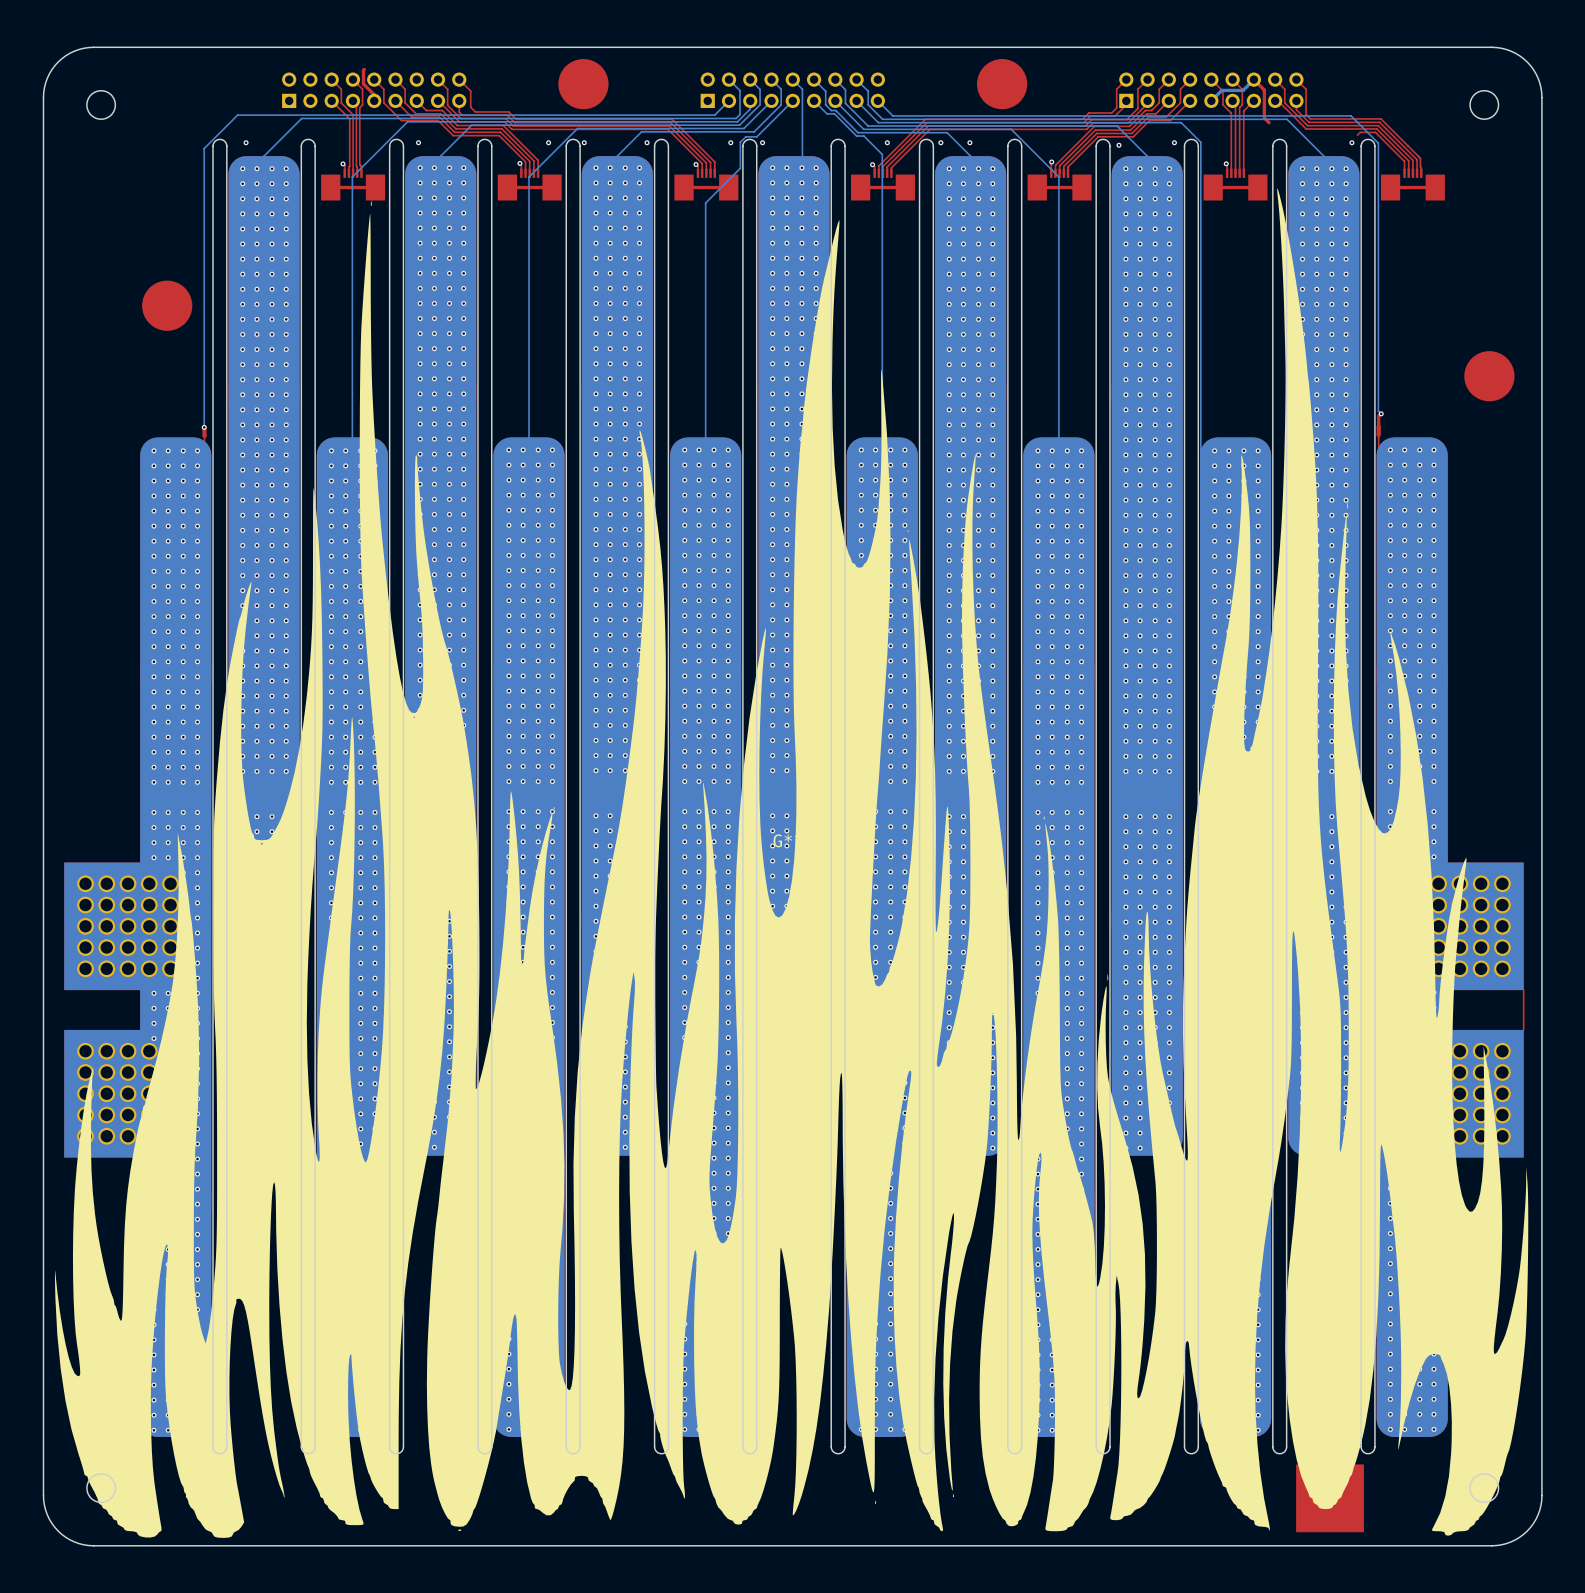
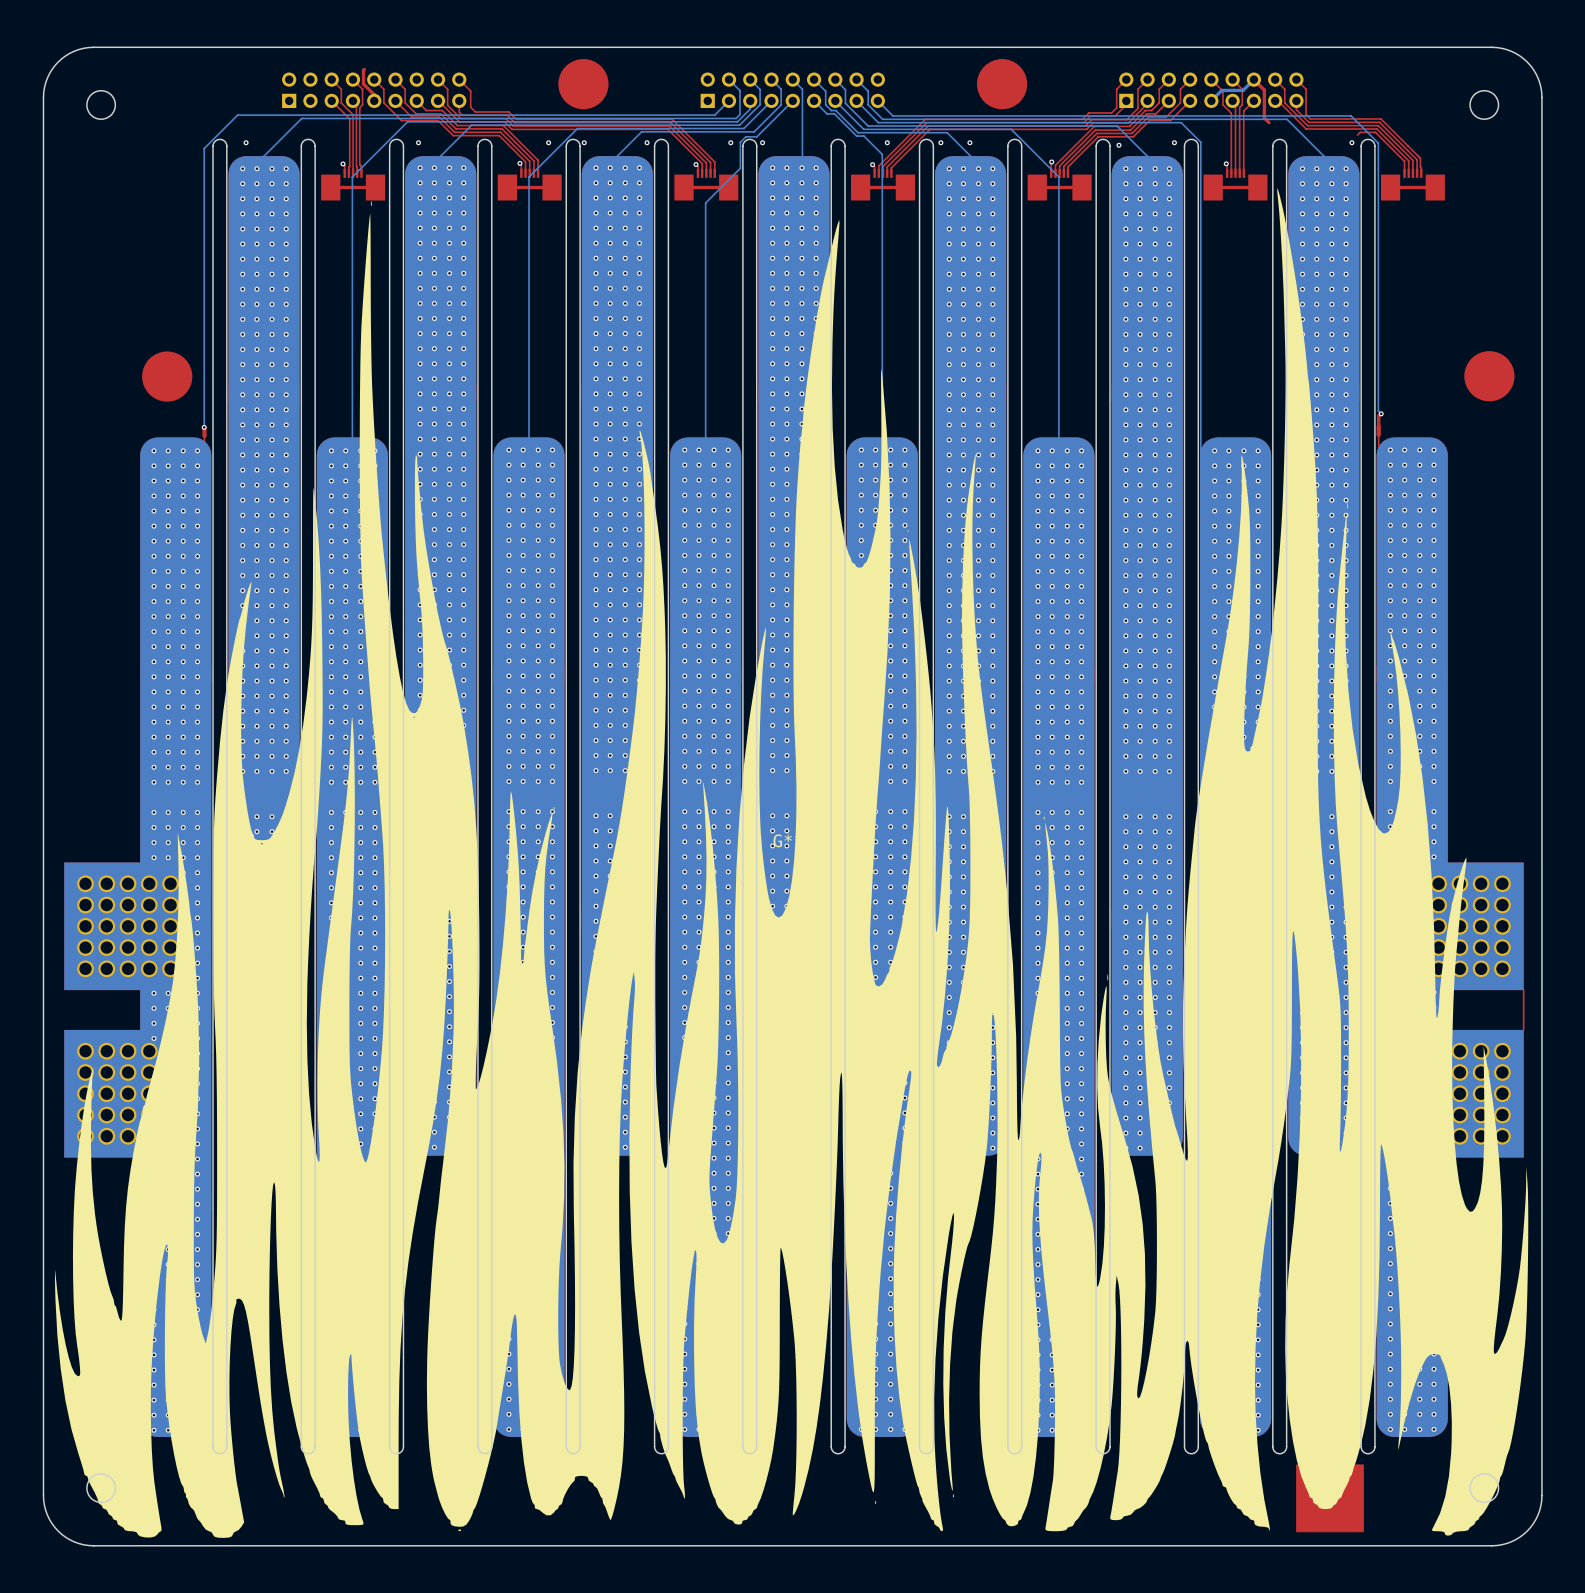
part position: (167, 305) -> (167, 376)

